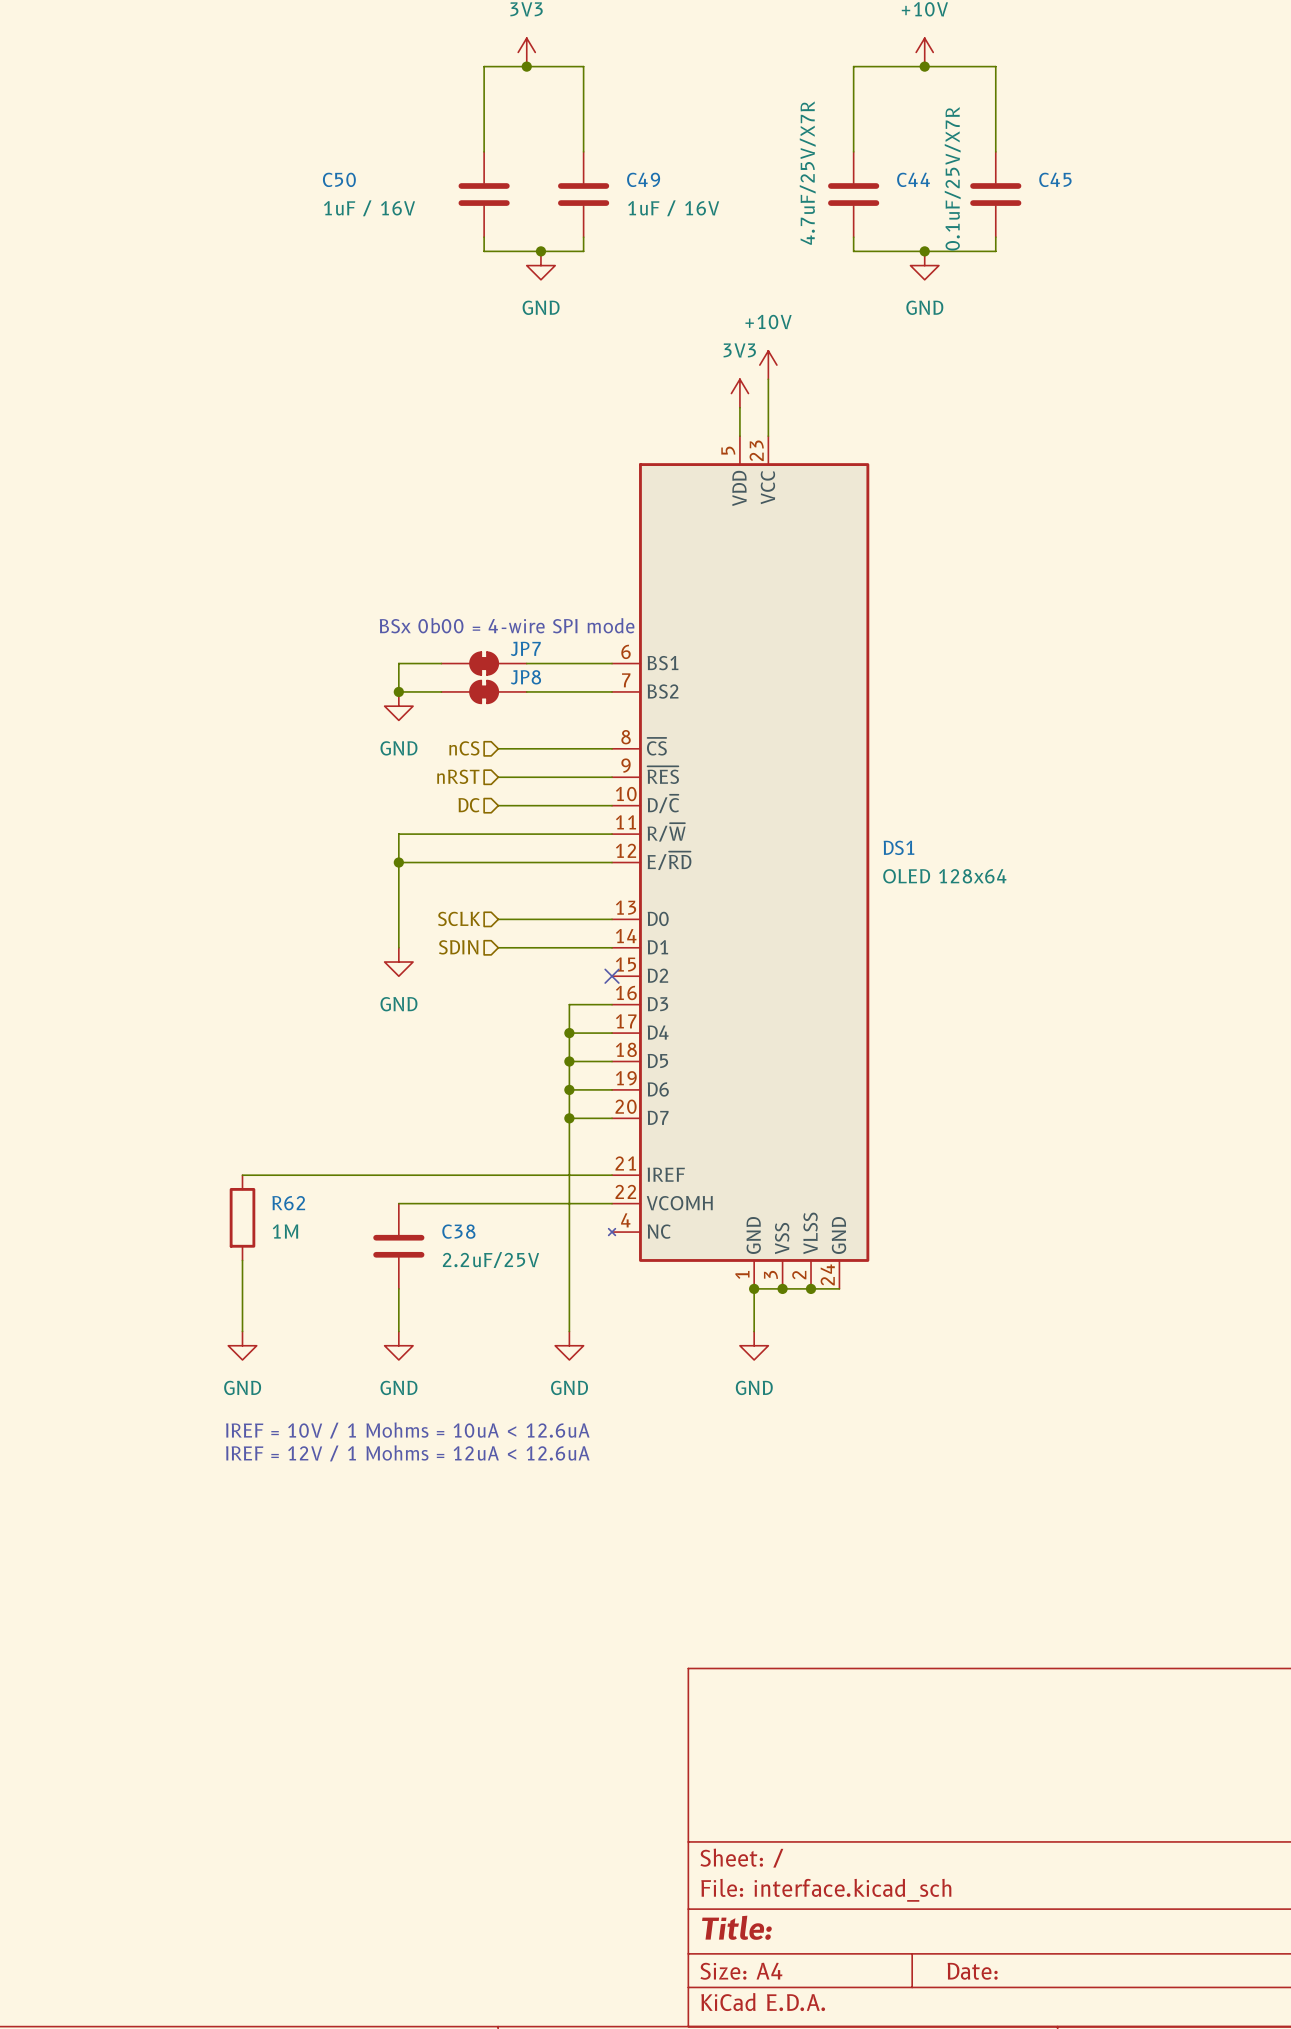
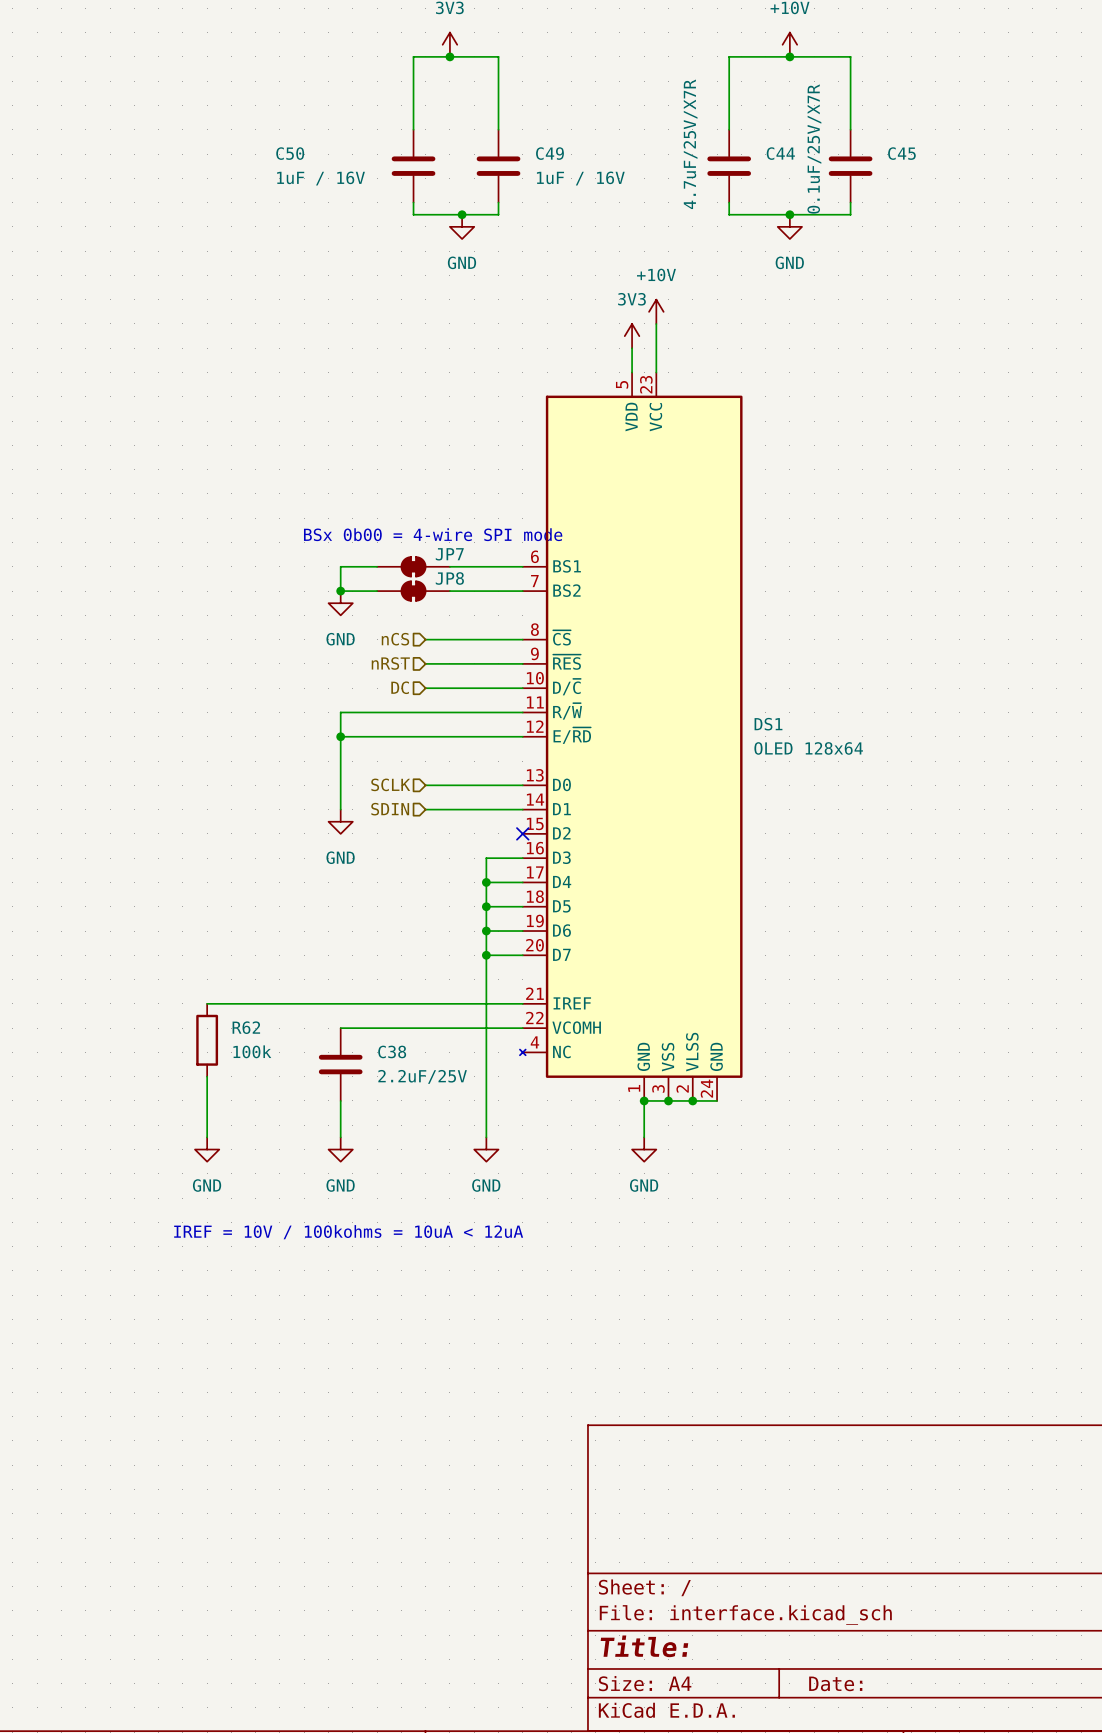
R62 value: 1M (285, 1231) -> 100k (252, 1051)
text: IREF = 10V / 1 Mohms = 10uA < 12.6uA (407, 1430) -> none
text: none -> IREF = 10V / 100kohms = 10uA < 12uA (348, 1232)
text: IREF = 12V / 1 Mohms = 12uA < 12.6uA (407, 1453) -> none

